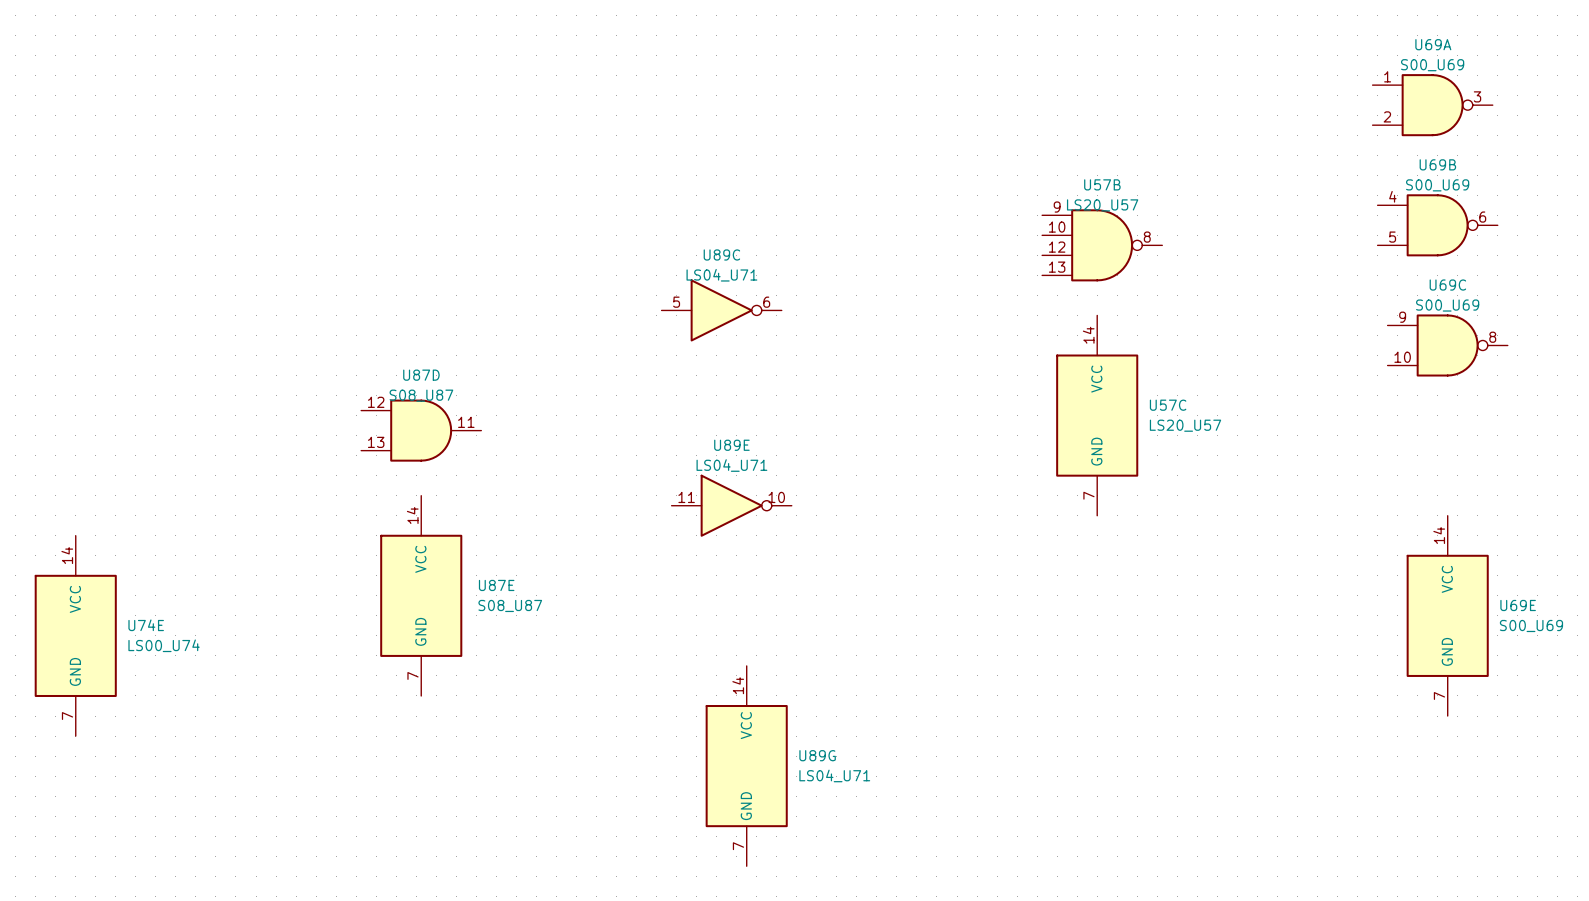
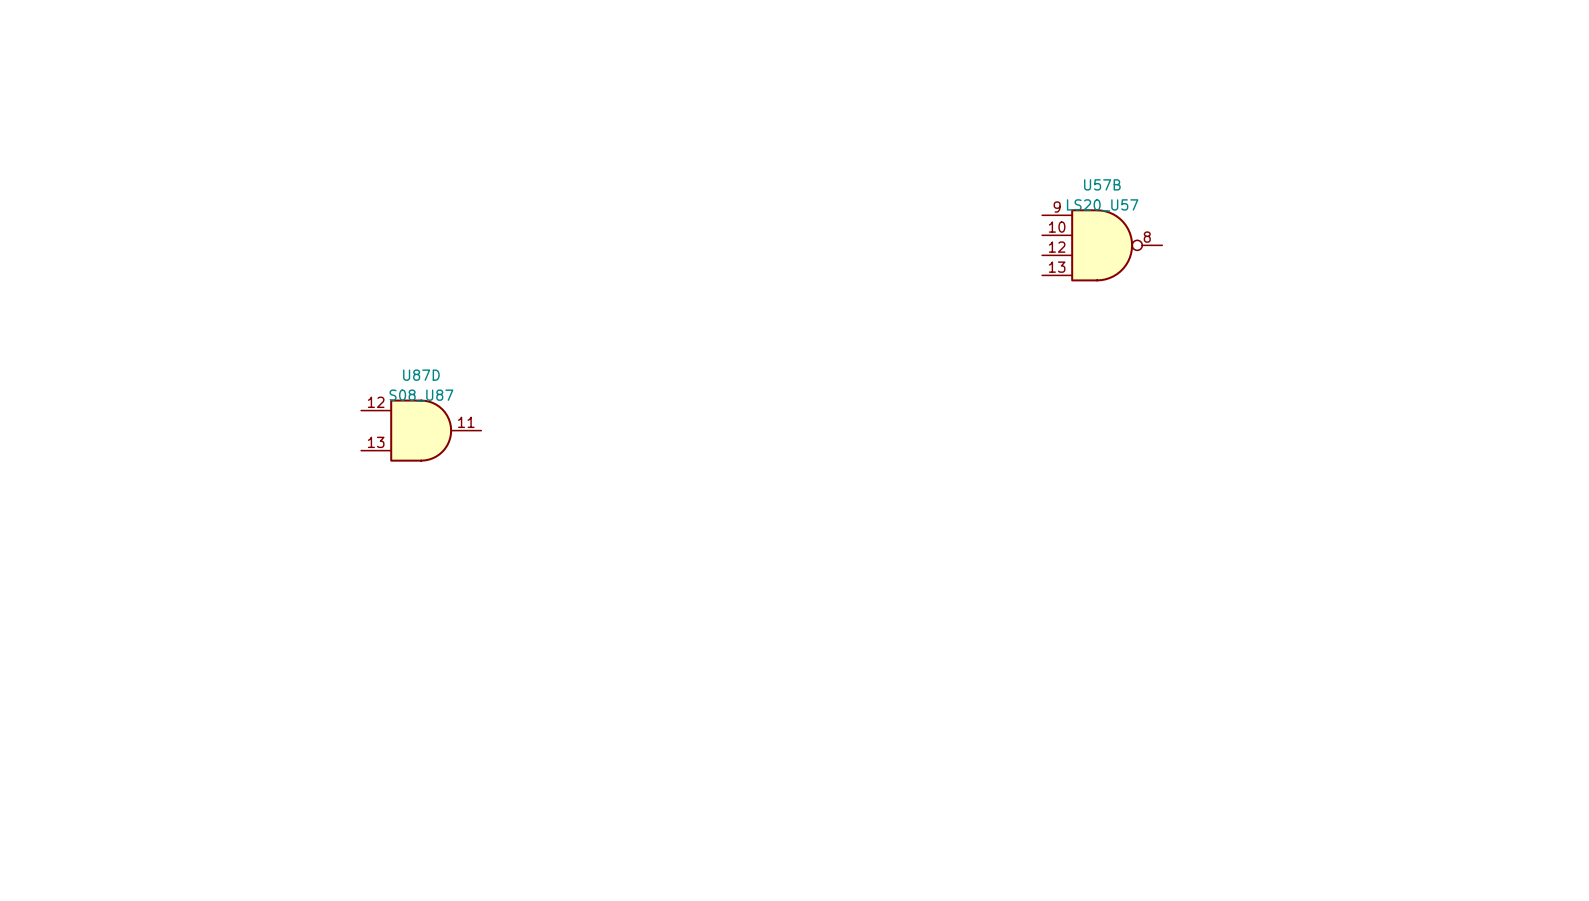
U69A: S00_U69 (1432, 105) -> none
U69B: S00_U69 (1437, 225) -> none
U89C: LS04_U71 (721, 310) -> none
U69C: S00_U69 (1447, 345) -> none
U57C: LS20_U57 (1097, 415) -> none
U89E: LS04_U71 (731, 505) -> none
U87E: S08_U87 (421, 595) -> none
U69E: S00_U69 (1447, 615) -> none
U74E: LS00_U74 (75, 635) -> none
U89G: LS04_U71 (746, 766) -> none

